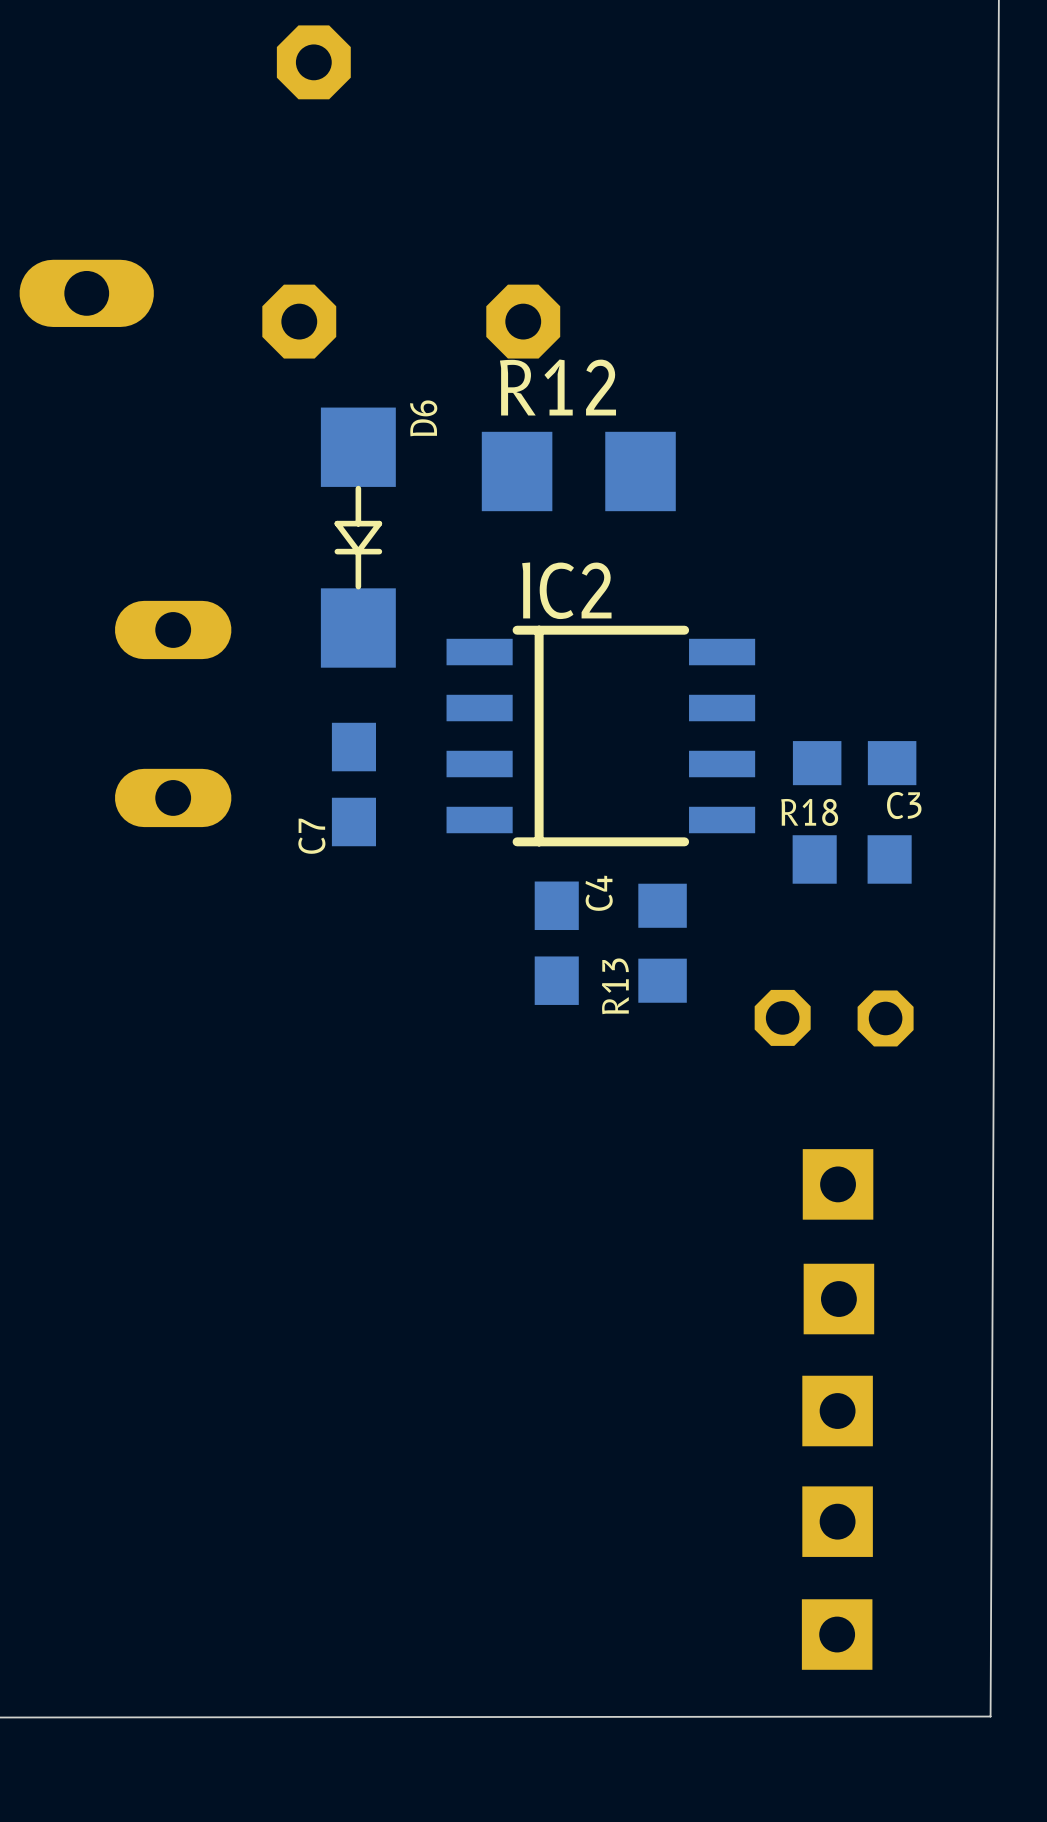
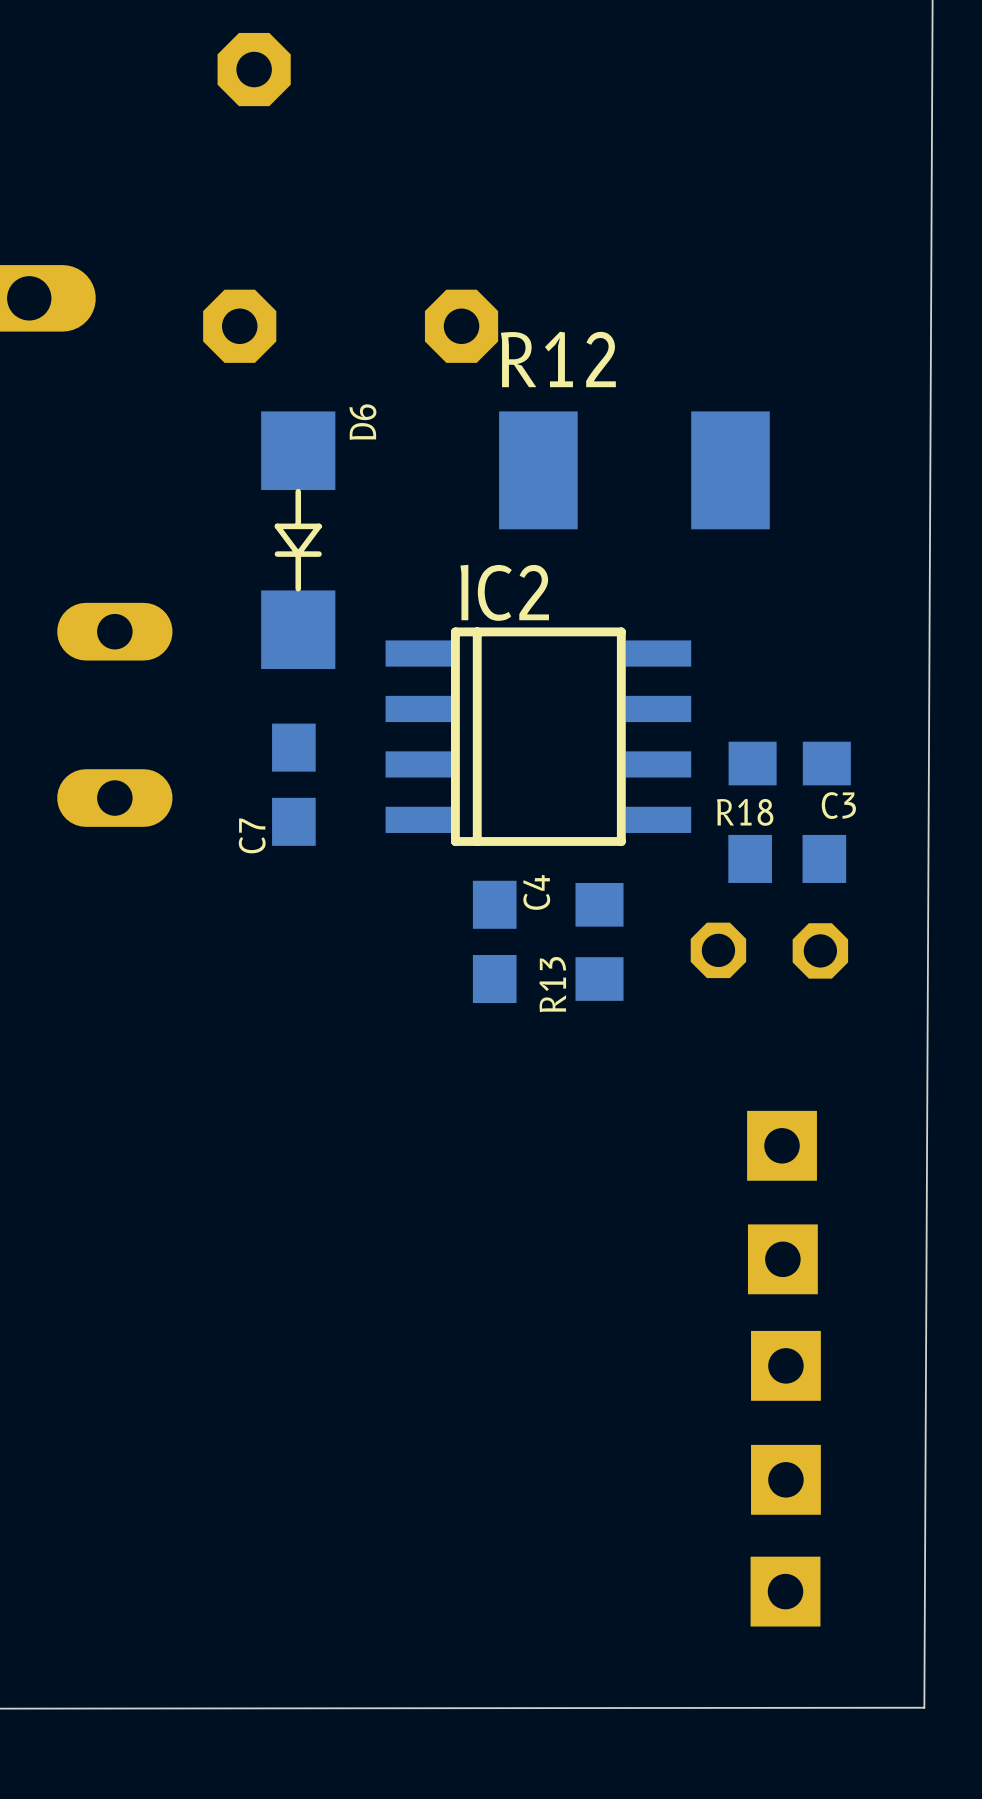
R12 footprint: [481, 431, 676, 512] -> [499, 411, 770, 530]
IC2 footprint: [446, 625, 756, 847] -> [385, 627, 692, 846]
part position: (834, 1018) -> (769, 950)
part position: (838, 1184) -> (782, 1145)
part: none -> (782, 1259)
part: (838, 1299) -> none
part: none -> (785, 1365)
part: (837, 1411) -> none
part position: (837, 1521) -> (785, 1479)
part position: (837, 1634) -> (785, 1591)

